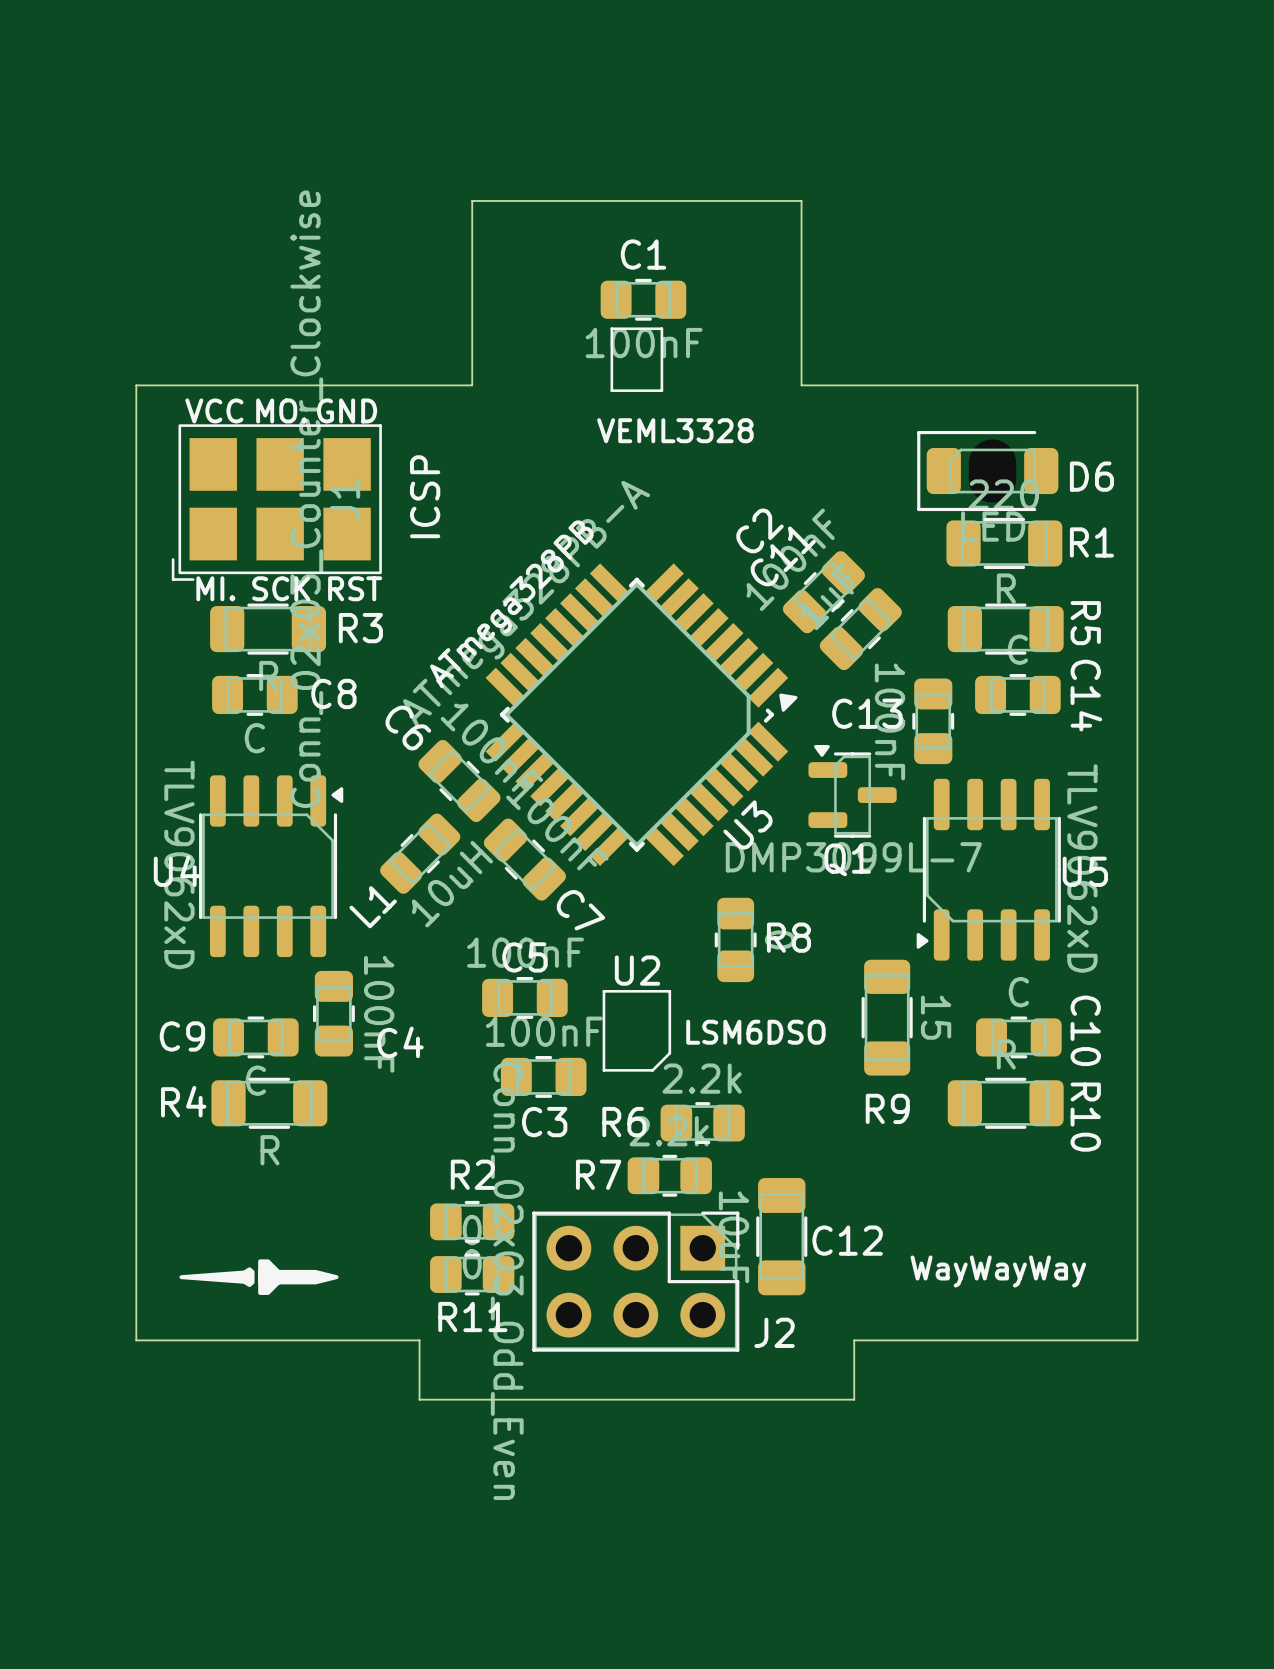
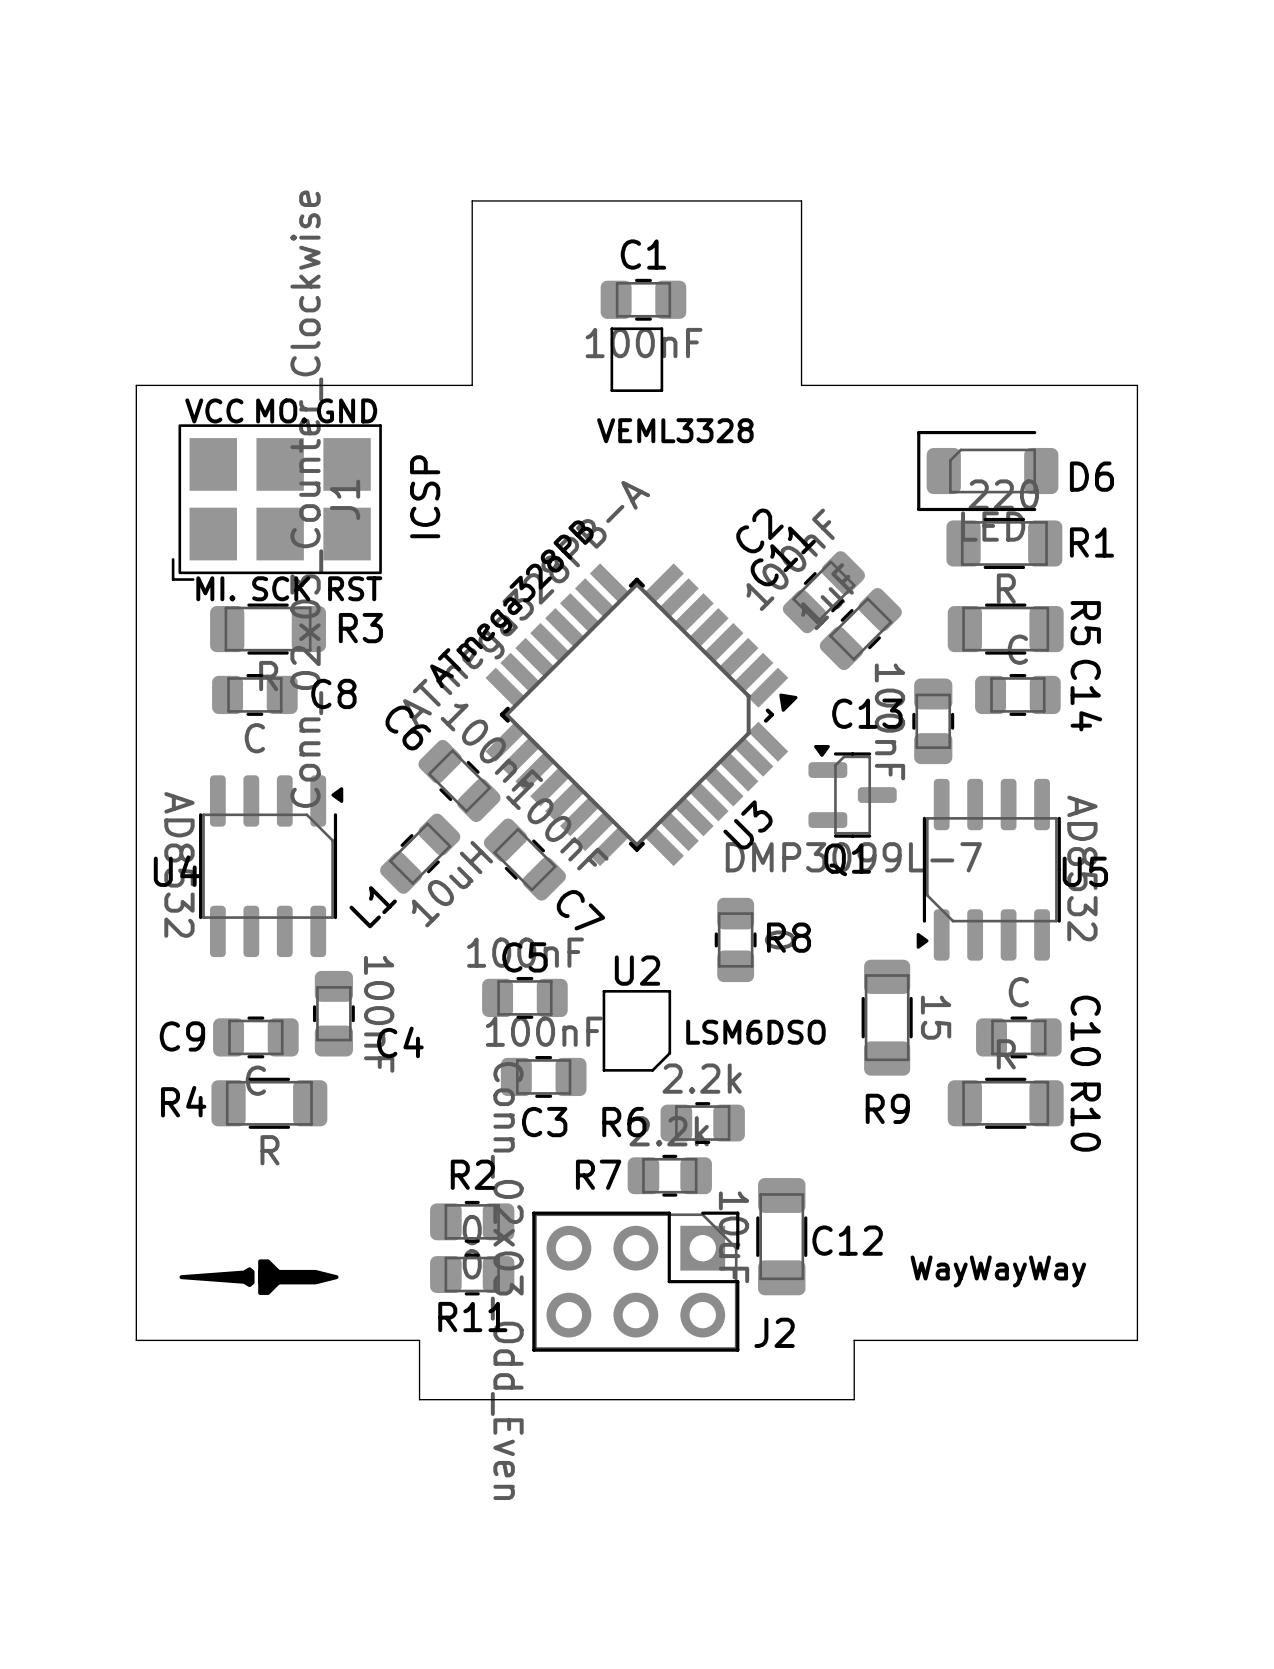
U4 value: TLV9062xD (179, 864) -> AD8532 (179, 864)
U5 value: TLV9062xD (1082, 868) -> AD8532 (1082, 868)

